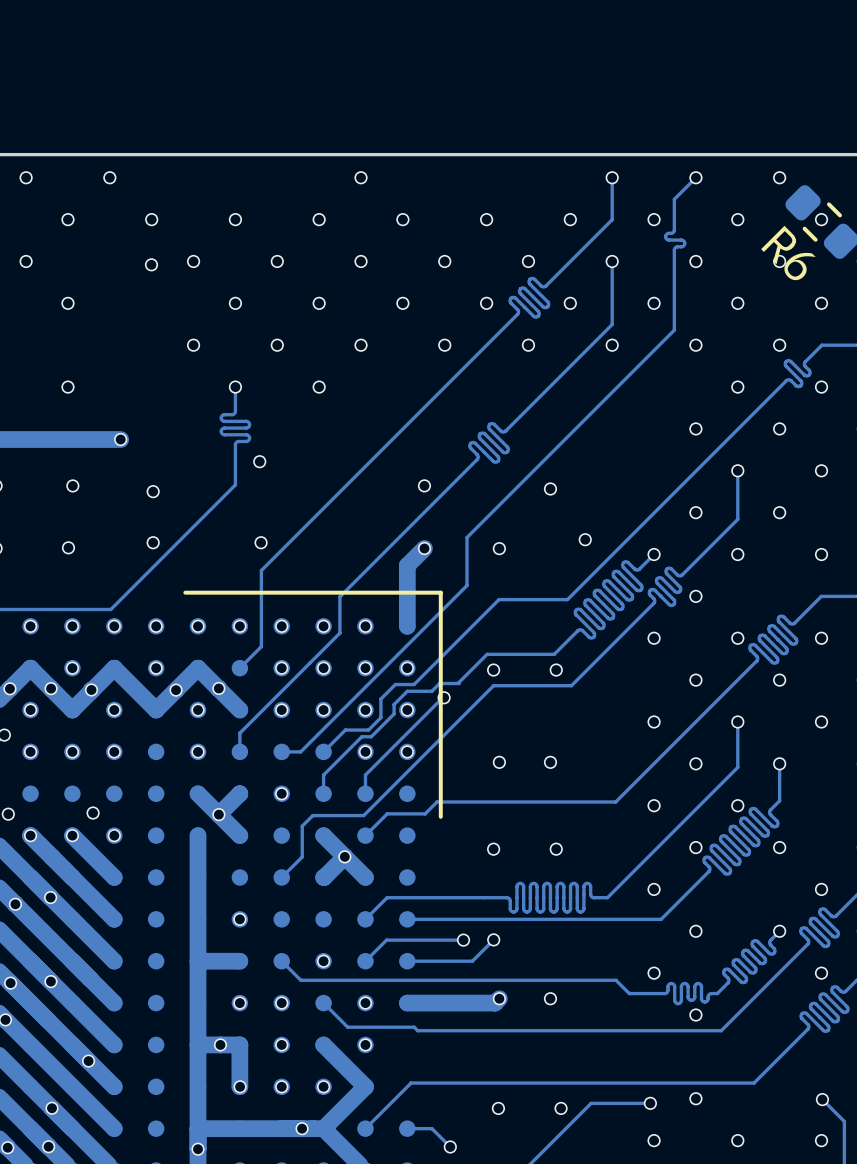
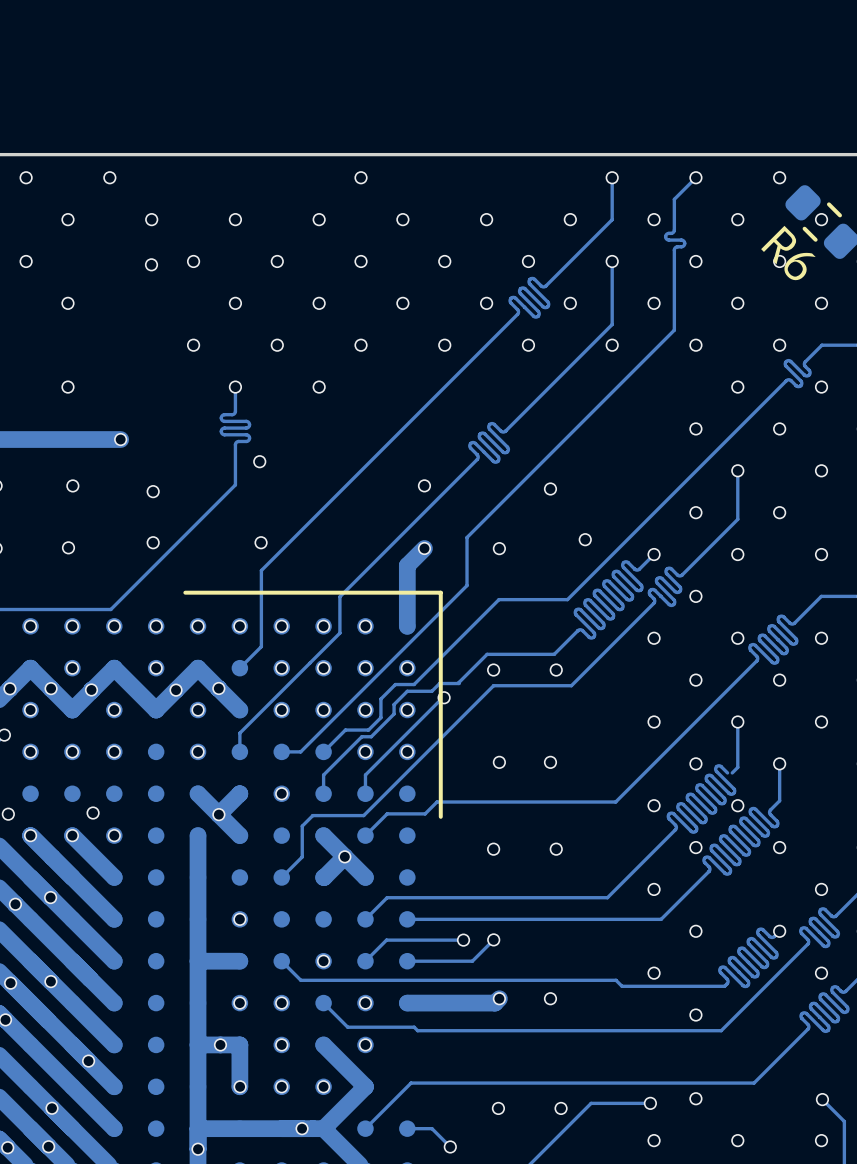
track: (732, 772) (675, 829) -> (727, 772) (720, 766) (715, 767) (716, 771) (734, 789) (733, 793) (729, 793) (711, 775) (707, 775) (706, 780) (724, 798) (724, 802) (720, 803) (702, 785) (698, 785) (697, 789) (715, 807) (715, 811) (710, 812) (692, 794) (689, 794) (687, 799) (705, 817) (706, 820) (701, 822) (680, 803) (678, 808) (696, 829) (691, 831) (670, 813) (668, 817) (675, 825) (675, 829)
track: (593, 897) (590, 895) (590, 885) (585, 883) (583, 909) (578, 911) (577, 885) (572, 883) (570, 909) (565, 911) (563, 909) (563, 885) (559, 883) (557, 886) (557, 909) (552, 911) (550, 909) (550, 885) (546, 883) (543, 886) (543, 909) (539, 911) (537, 909) (536, 885) (532, 883) (530, 886) (530, 909) (527, 912) (523, 909) (522, 884) (517, 885) (515, 911) (510, 910) (510, 900) (506, 897) -> (593, 897) (506, 897)
track: (774, 936) (769, 942) (774, 950) (772, 954) (757, 941) (752, 942) (752, 946) (765, 958) (764, 962) (760, 963) (747, 950) (744, 950) (742, 955) (755, 967) (755, 971) (751, 972) (738, 960) (735, 959) (733, 964) (745, 977) (746, 980) (741, 982) (726, 969) (723, 972) (728, 979) (727, 983) -> (774, 936) (770, 936) (762, 929) (757, 931) (776, 952) (774, 958) (753, 939) (748, 941) (767, 962) (765, 967) (762, 966) (743, 948) (738, 949) (739, 953) (757, 971) (756, 976) (752, 976) (734, 957) (729, 959) (729, 962) (748, 981) (747, 985) (743, 985) (725, 967) (720, 967) (719, 971) (727, 979) (727, 983)
track: (724, 986) (717, 993) (709, 994) (707, 1000) (704, 1001) (701, 999) (700, 984) (695, 985) (694, 997) (691, 1000) (688, 997) (687, 985) (683, 983) (681, 986) (681, 1001) (678, 1003) (674, 1001) (674, 986) (672, 983) (668, 984) (667, 991) (664, 993) (629, 993) (622, 986) -> (724, 986) (622, 986)

